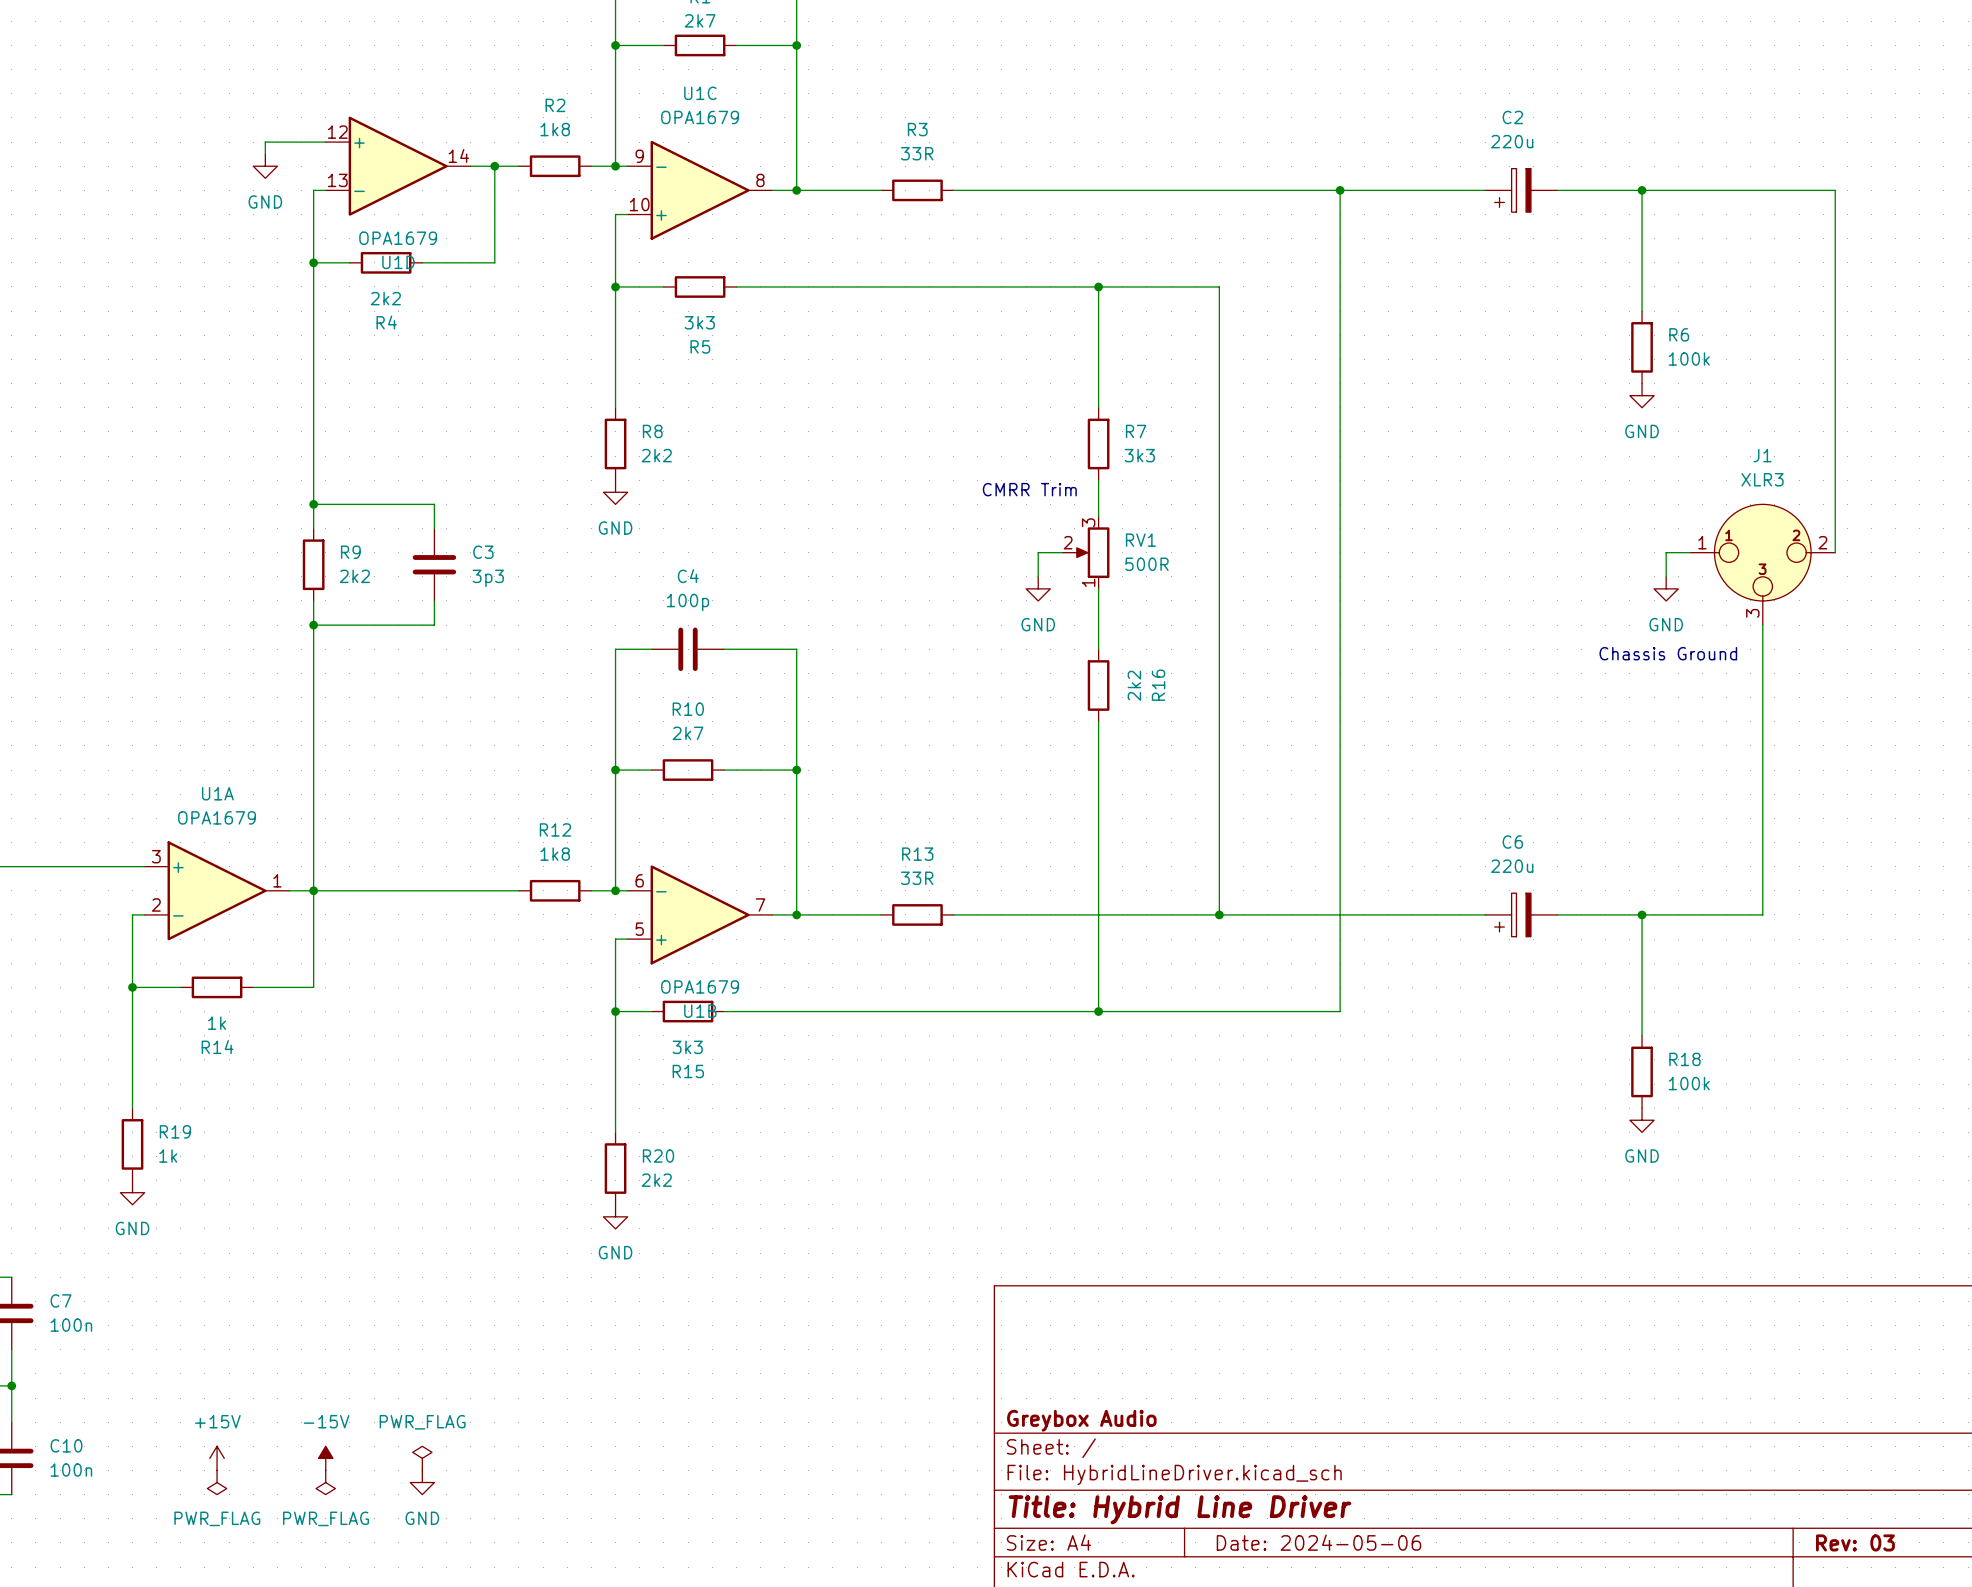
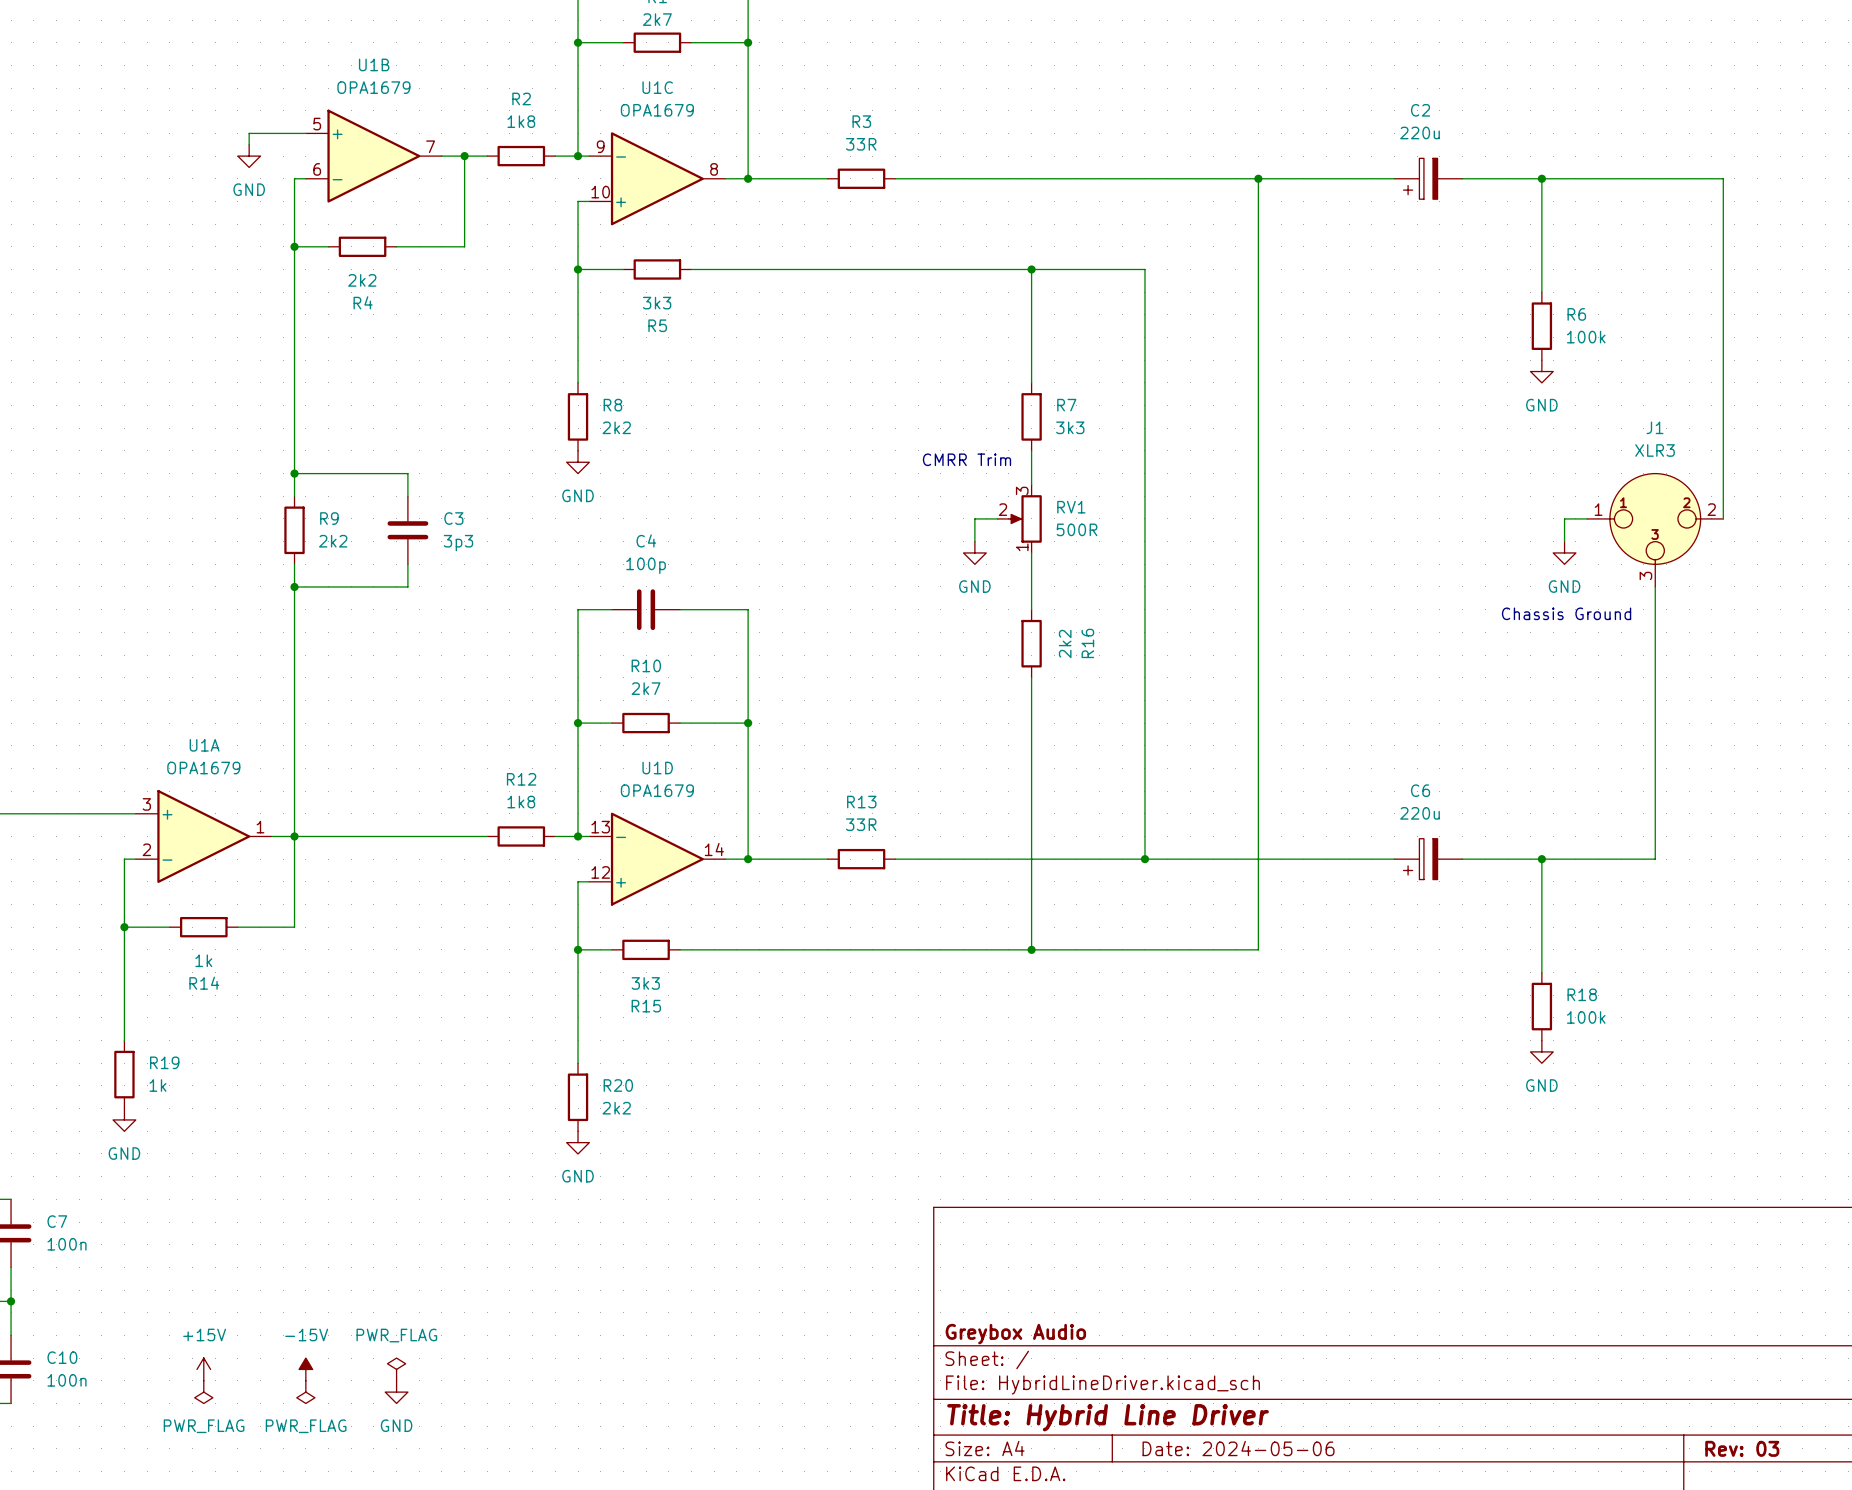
U1D flip: as is (398, 166) -> up-down (657, 859)
U1D position: (398, 166) -> (657, 859)
U1B flip: as is (700, 914) -> up-down (373, 156)
U1B position: (700, 914) -> (373, 156)

